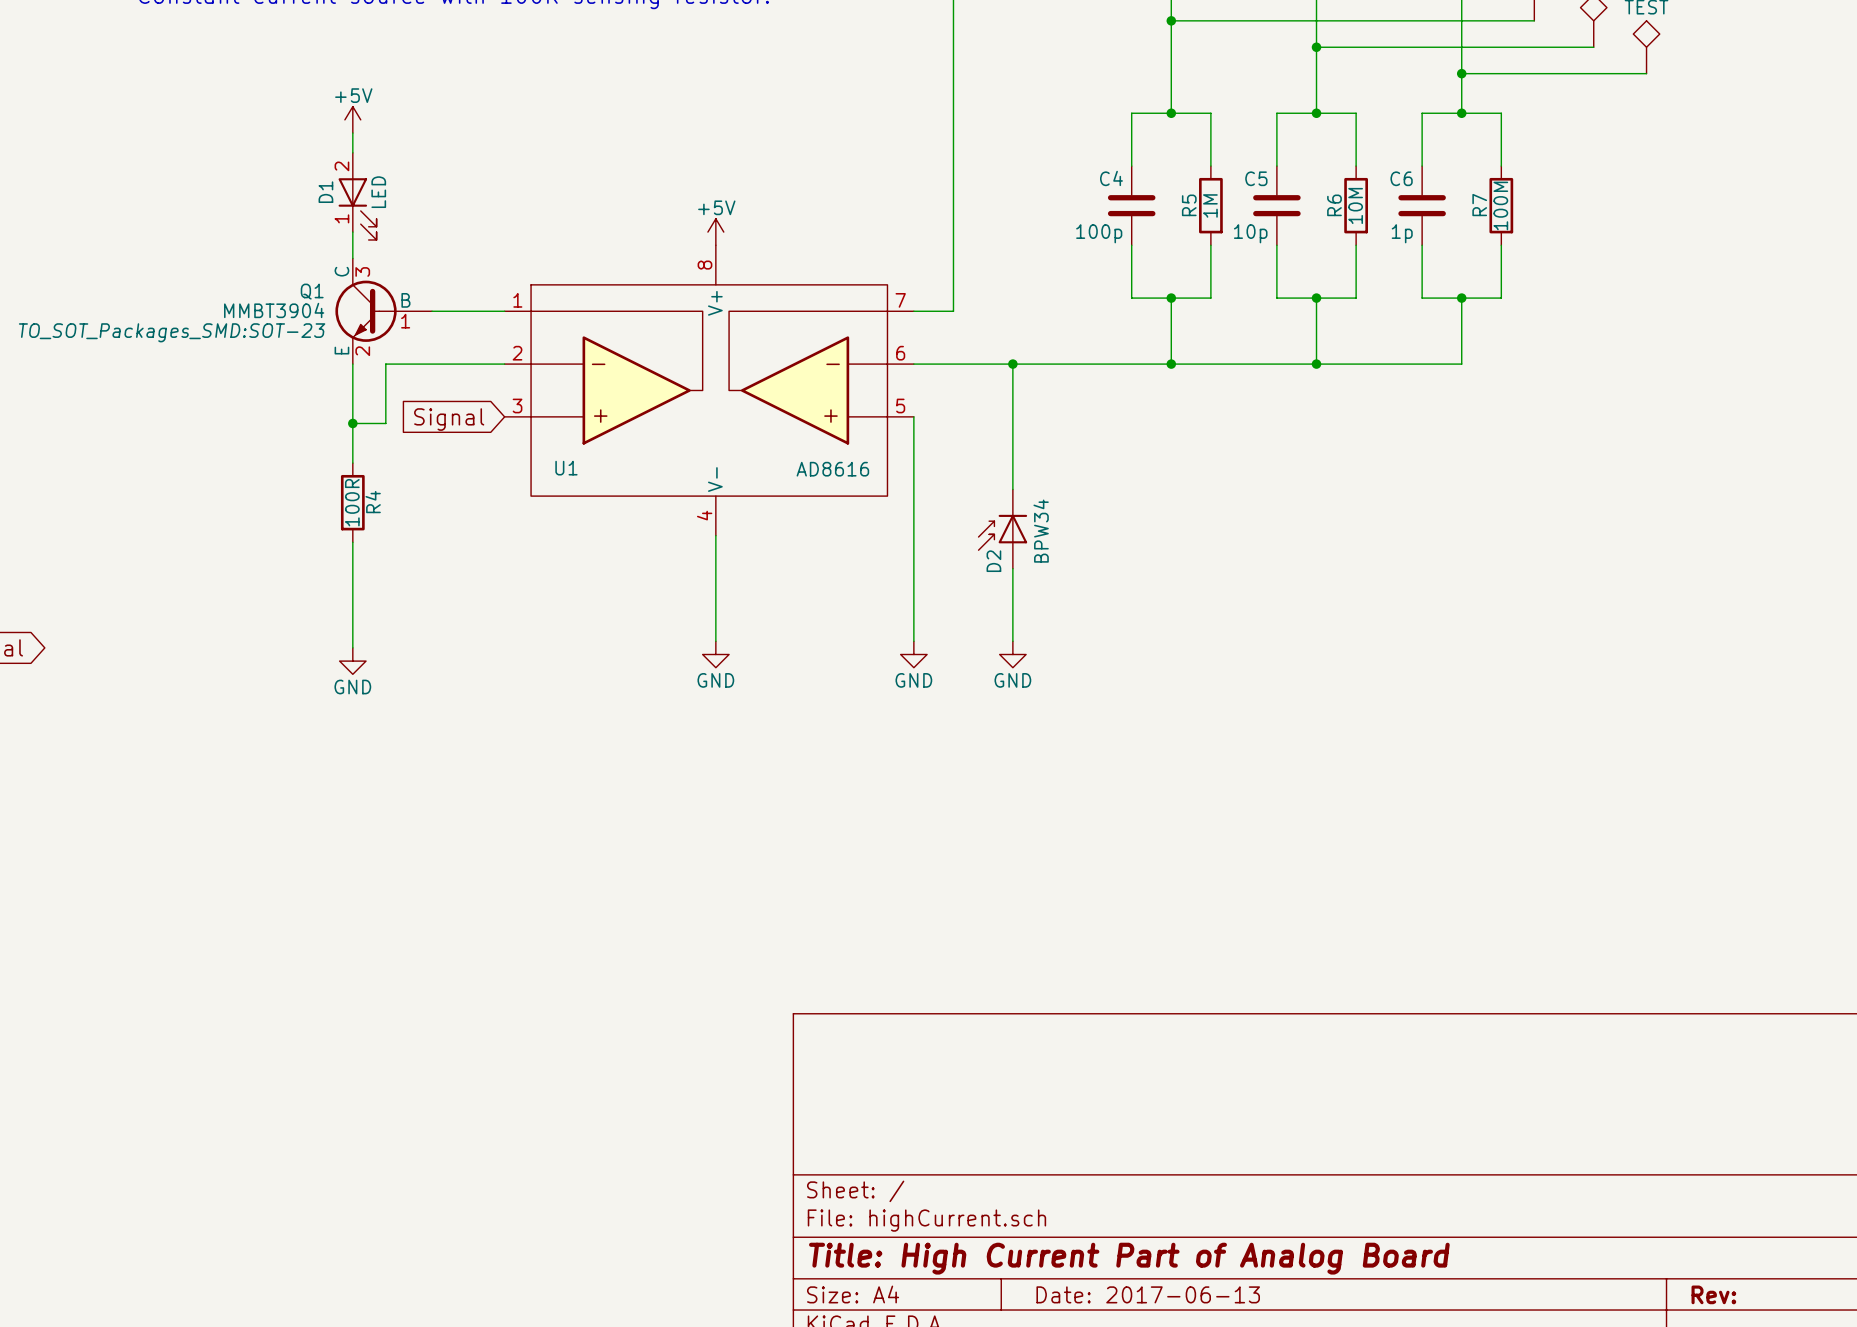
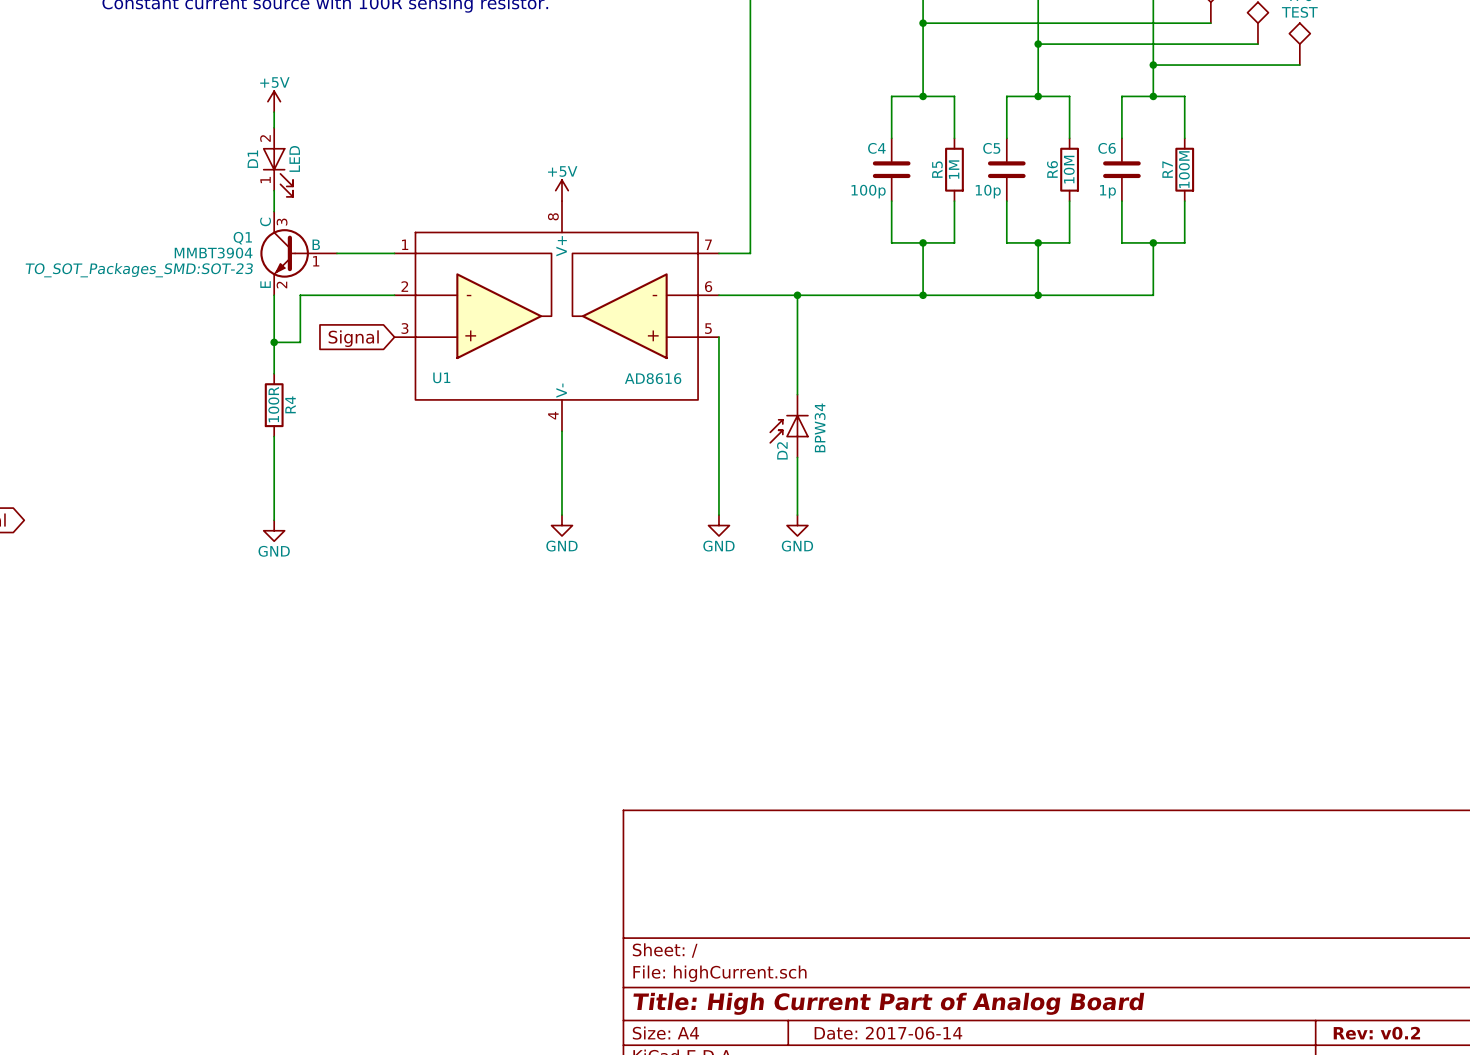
title block: Date: 2017-06-13 (1148, 1294) -> Date: 2017-06-14 (888, 1033)
title block: Rev: (1713, 1294) -> Rev: v0.2 (1376, 1033)

